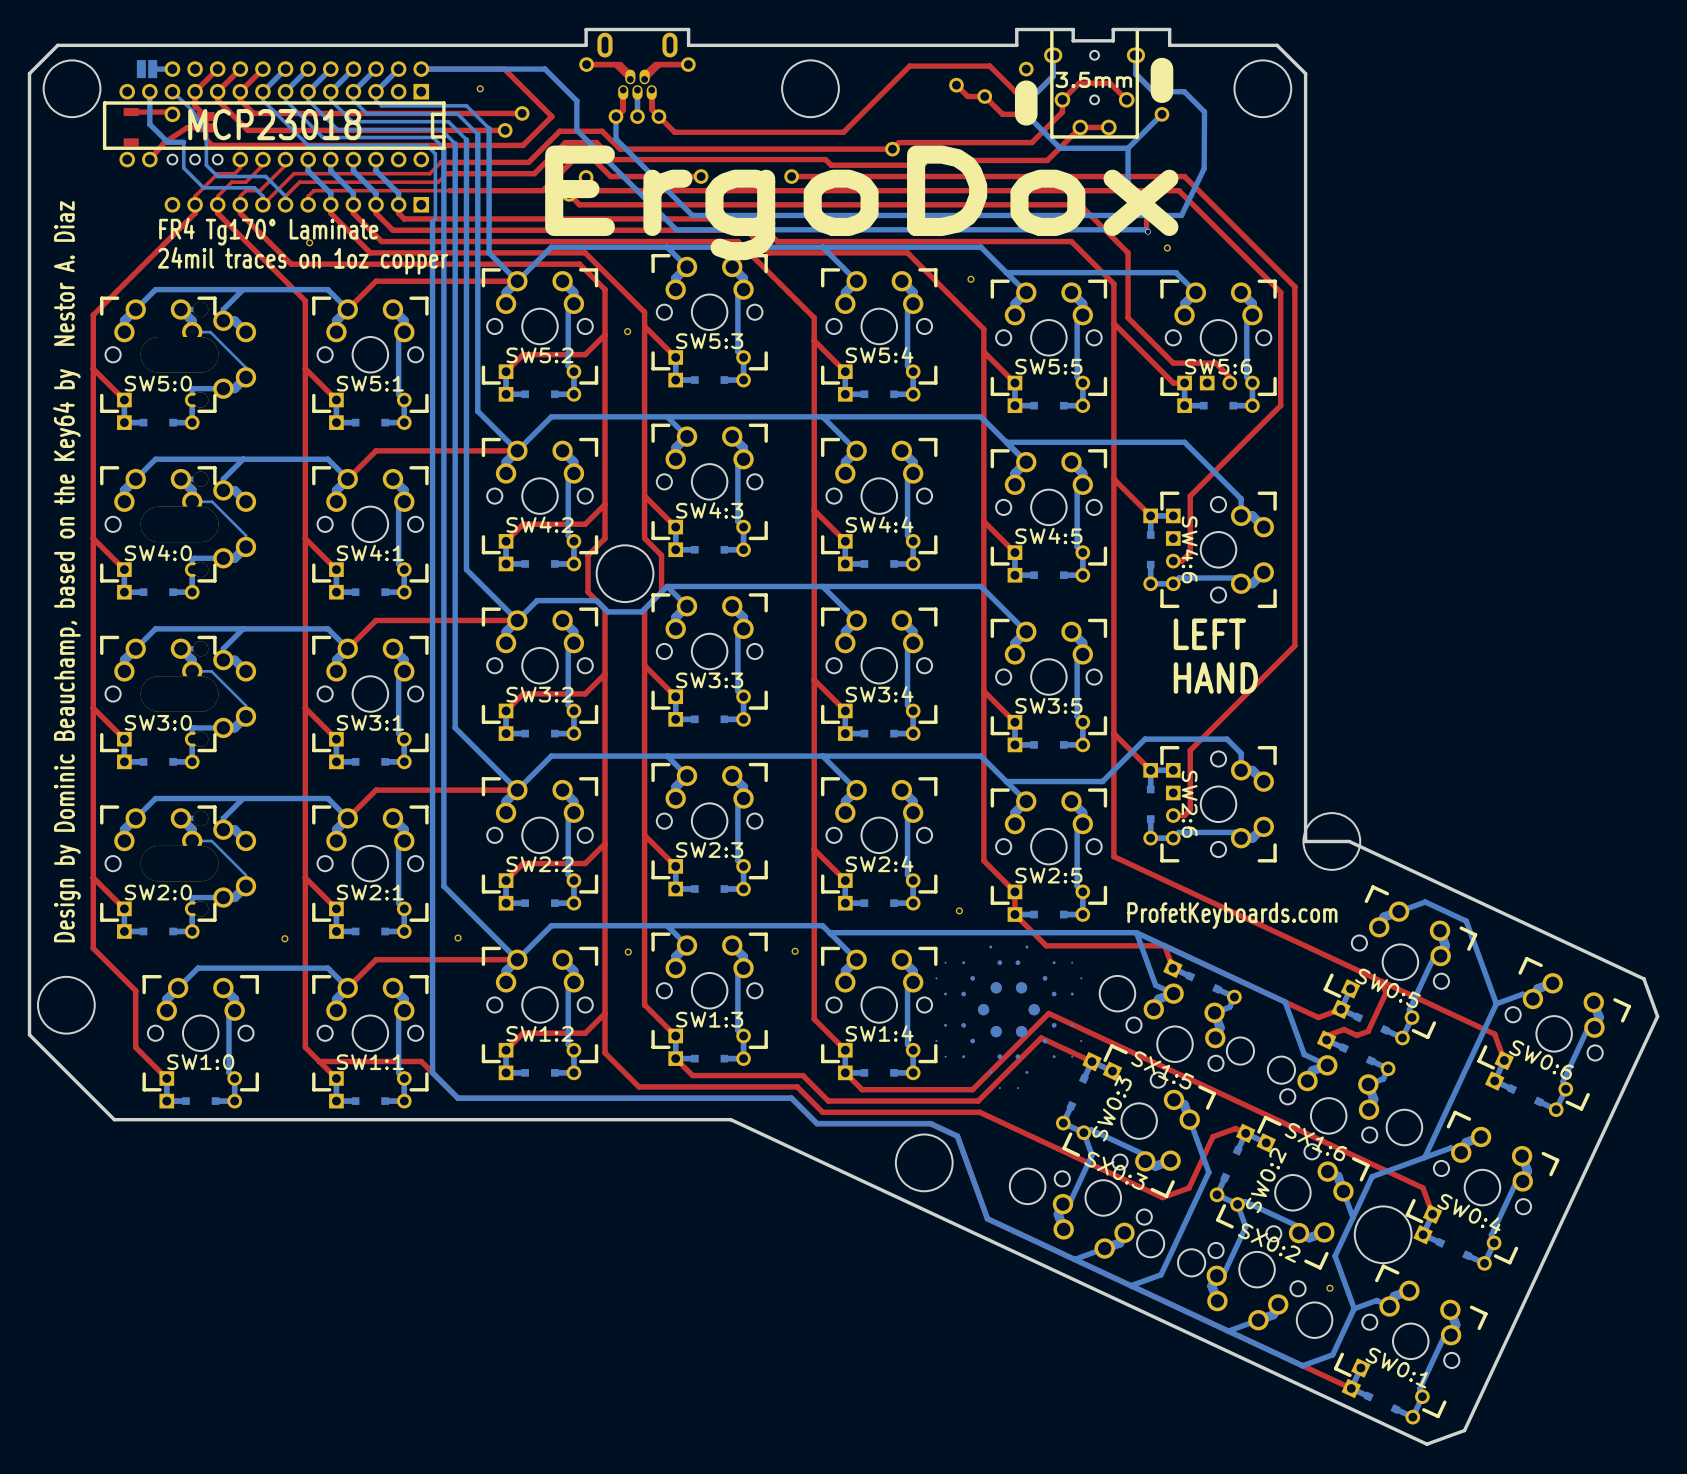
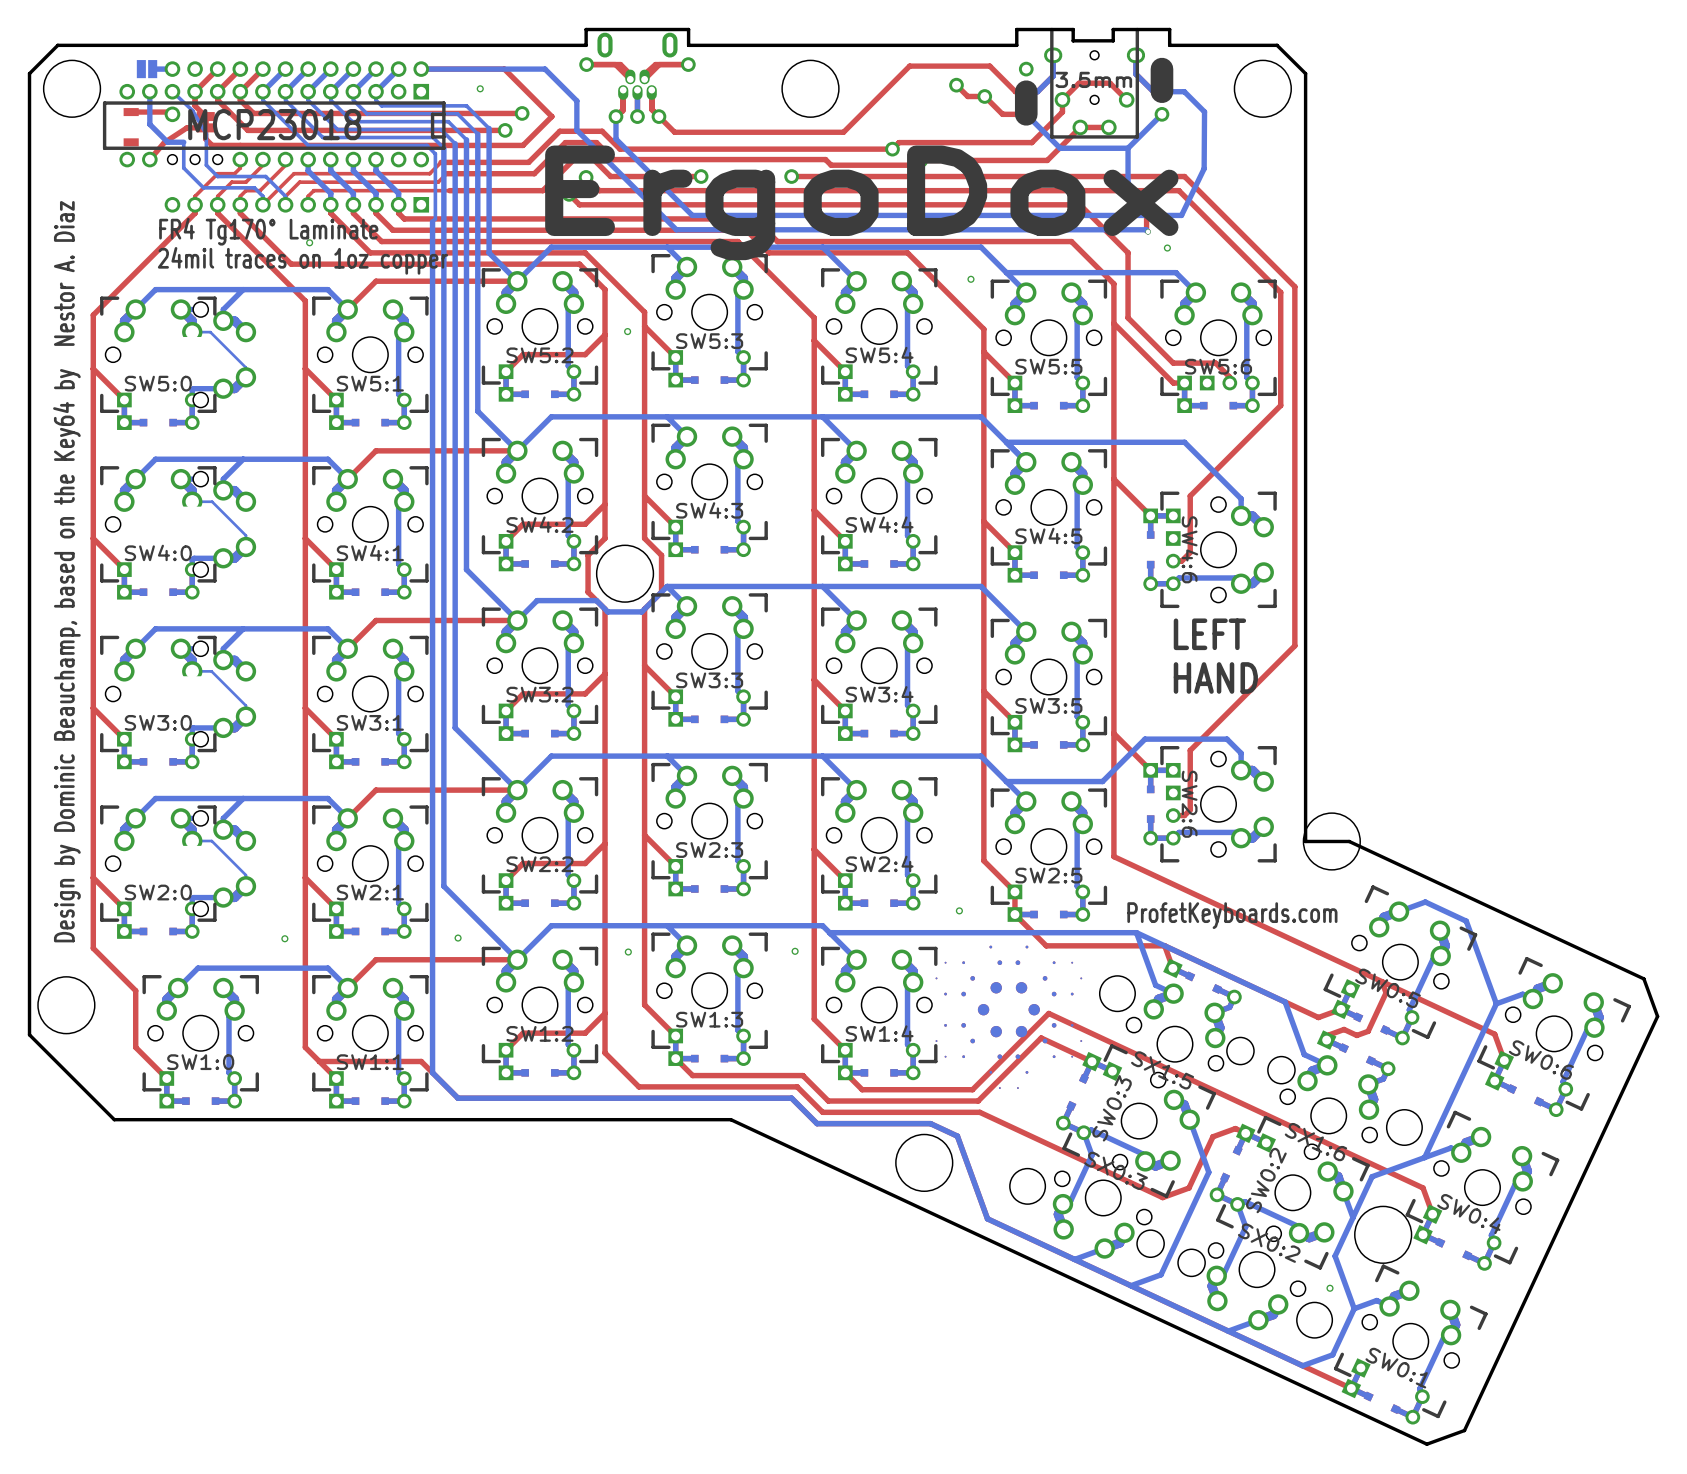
part footprint: [100, 296, 257, 430] -> [100, 296, 257, 430]
part footprint: [100, 466, 257, 600] -> [100, 466, 257, 600]
part footprint: [100, 635, 257, 770] -> [100, 635, 257, 770]
part footprint: [100, 805, 257, 939] -> [100, 805, 257, 939]

